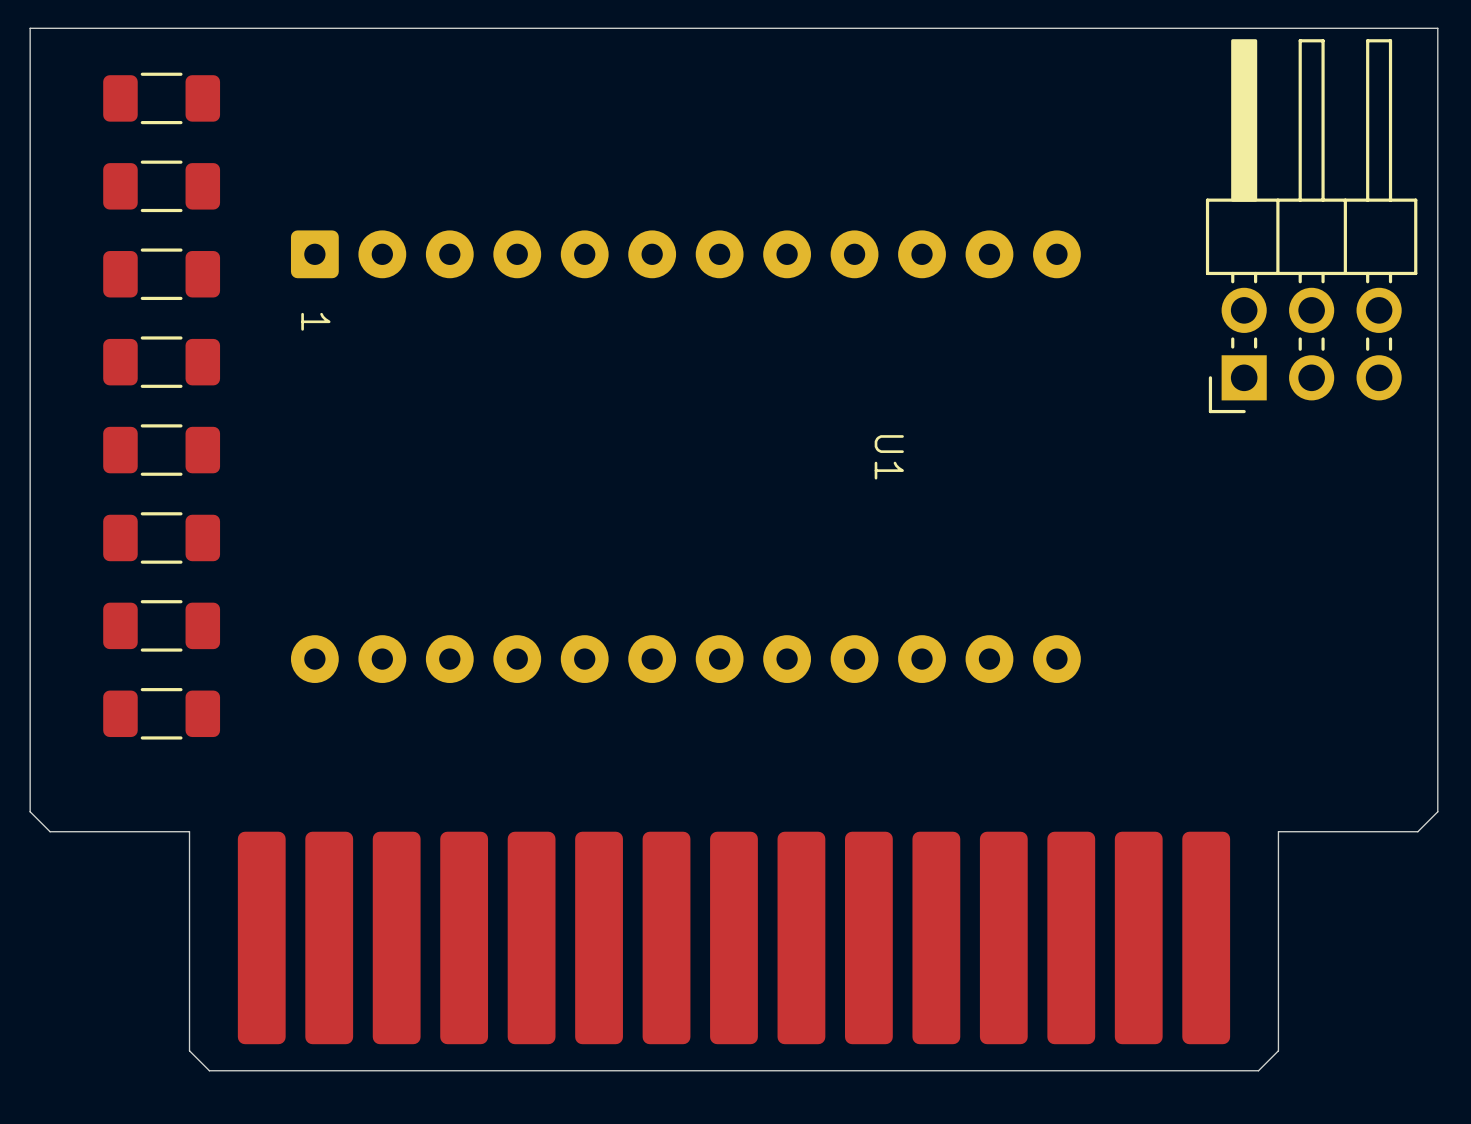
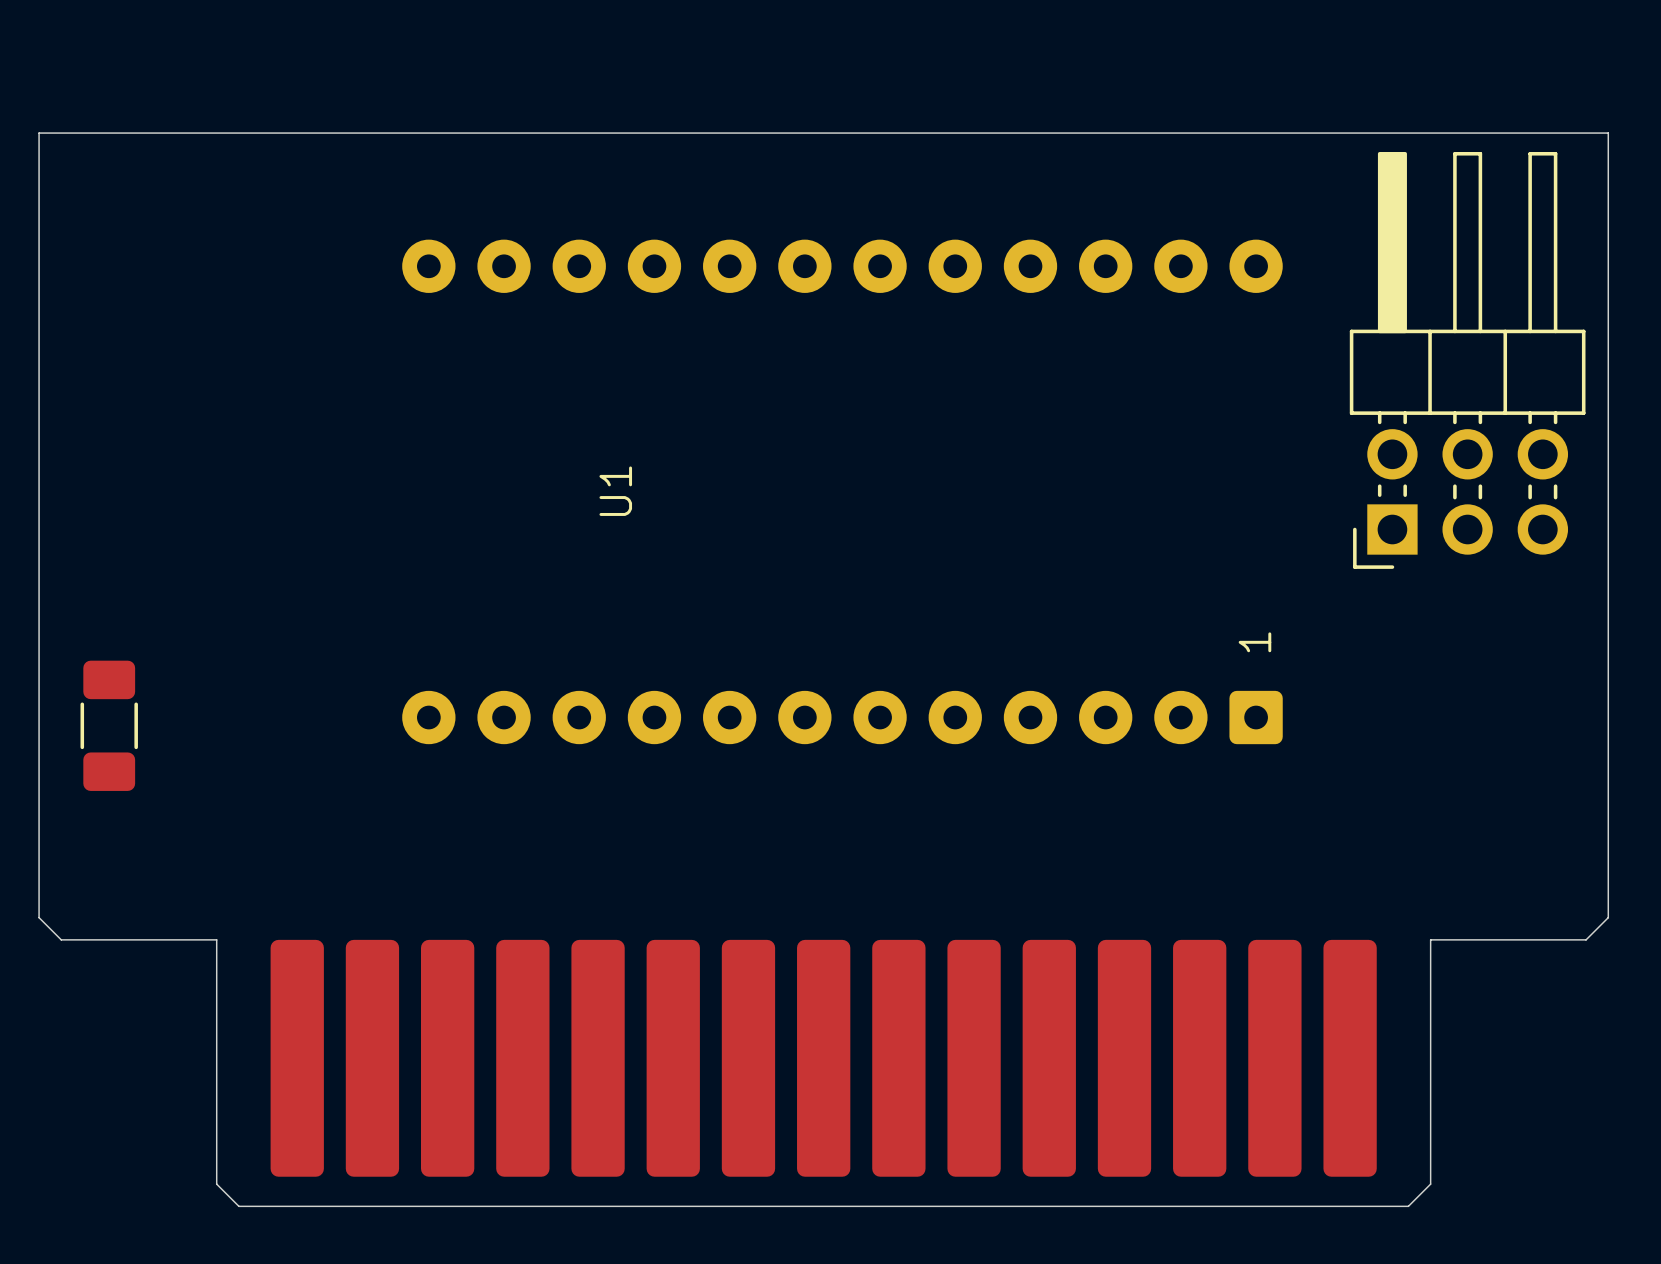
part: (161, 98) -> none
board edge: (30, 107) (30, 28) (1437, 28) (1437, 107) -> (39, 133) (1608, 133)
part: (161, 186) -> none
part position: (1311, 226) -> (1467, 360)
part: (161, 274) -> none
part: (161, 362) -> none
part: (161, 450) -> none
U1 rotation: 0° (685, 456) -> 180° (842, 491)
part: (161, 537) -> none
part: (161, 625) -> none
part: none -> (109, 725)
part: (161, 713) -> none

